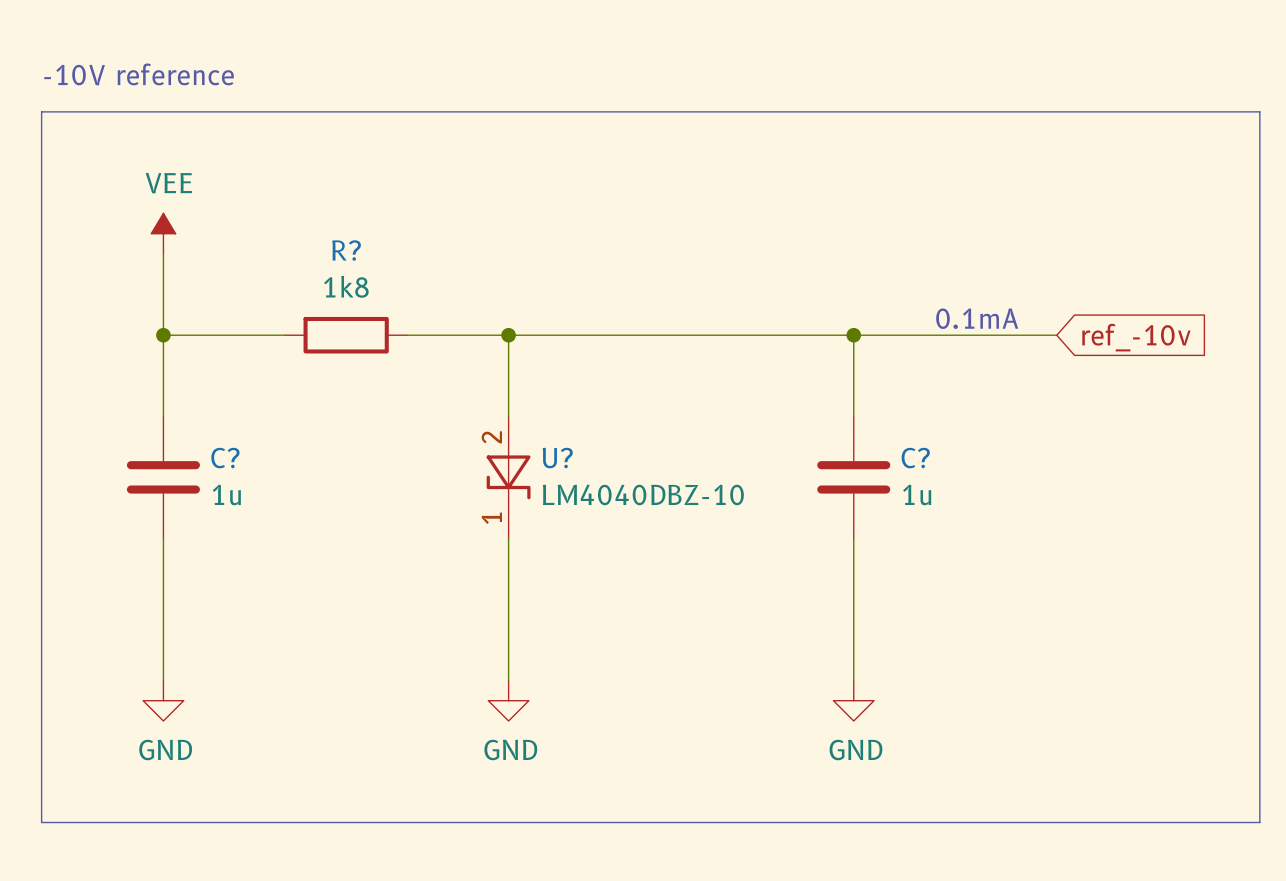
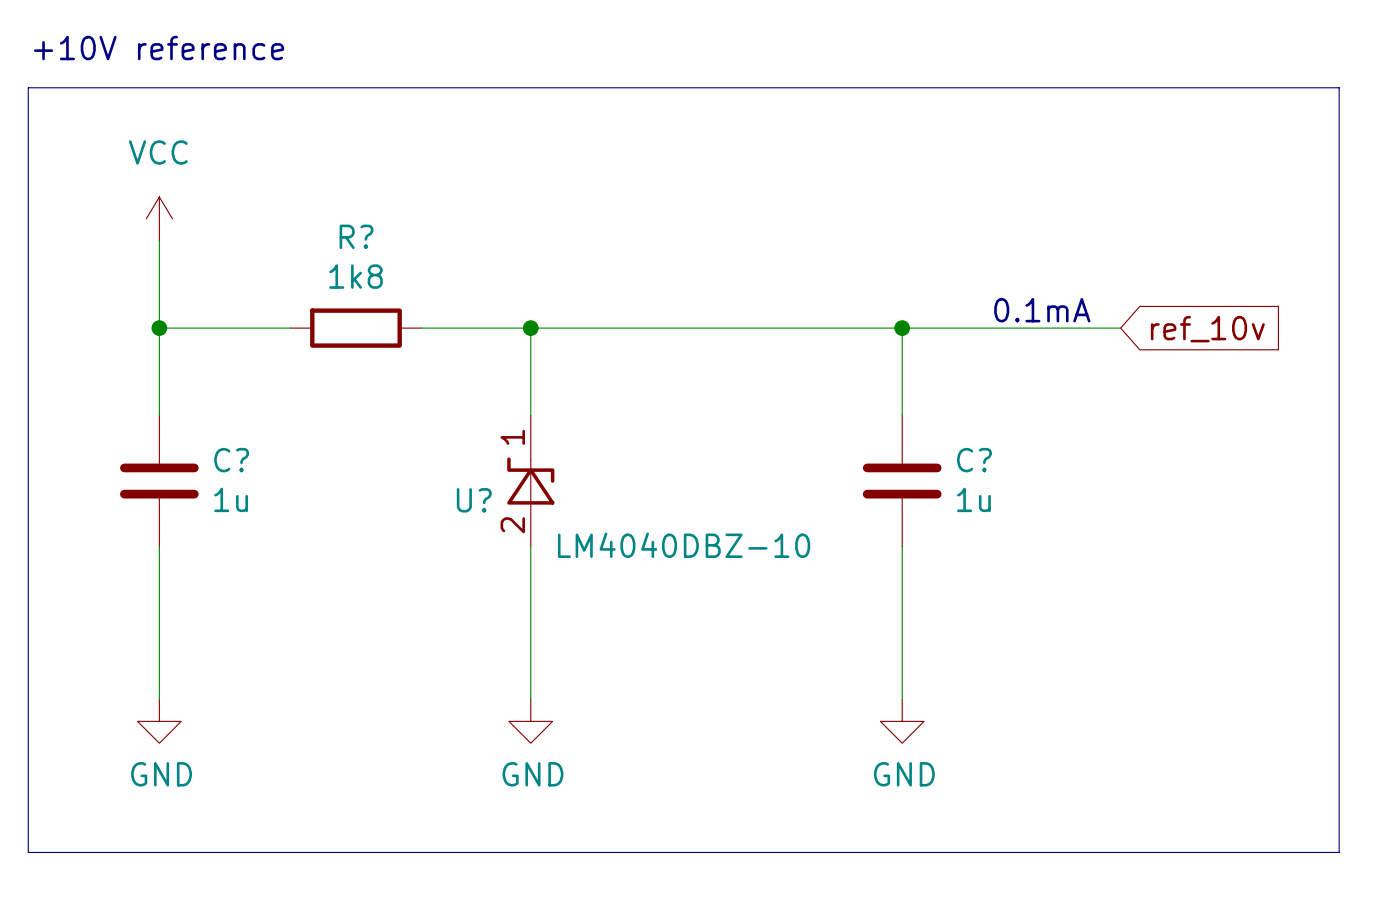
text: -10V reference (139, 74) -> +10V reference (159, 48)
power symbol: VEE (163, 233) -> VCC (159, 218)
global label: ref_-10v (1136, 337) -> ref_10v (1207, 329)
U? rotation: 0° (508, 477) -> 180° (530, 481)
U? value position: LM4040DBZ-10 (643, 494) -> LM4040DBZ-10 (684, 545)

